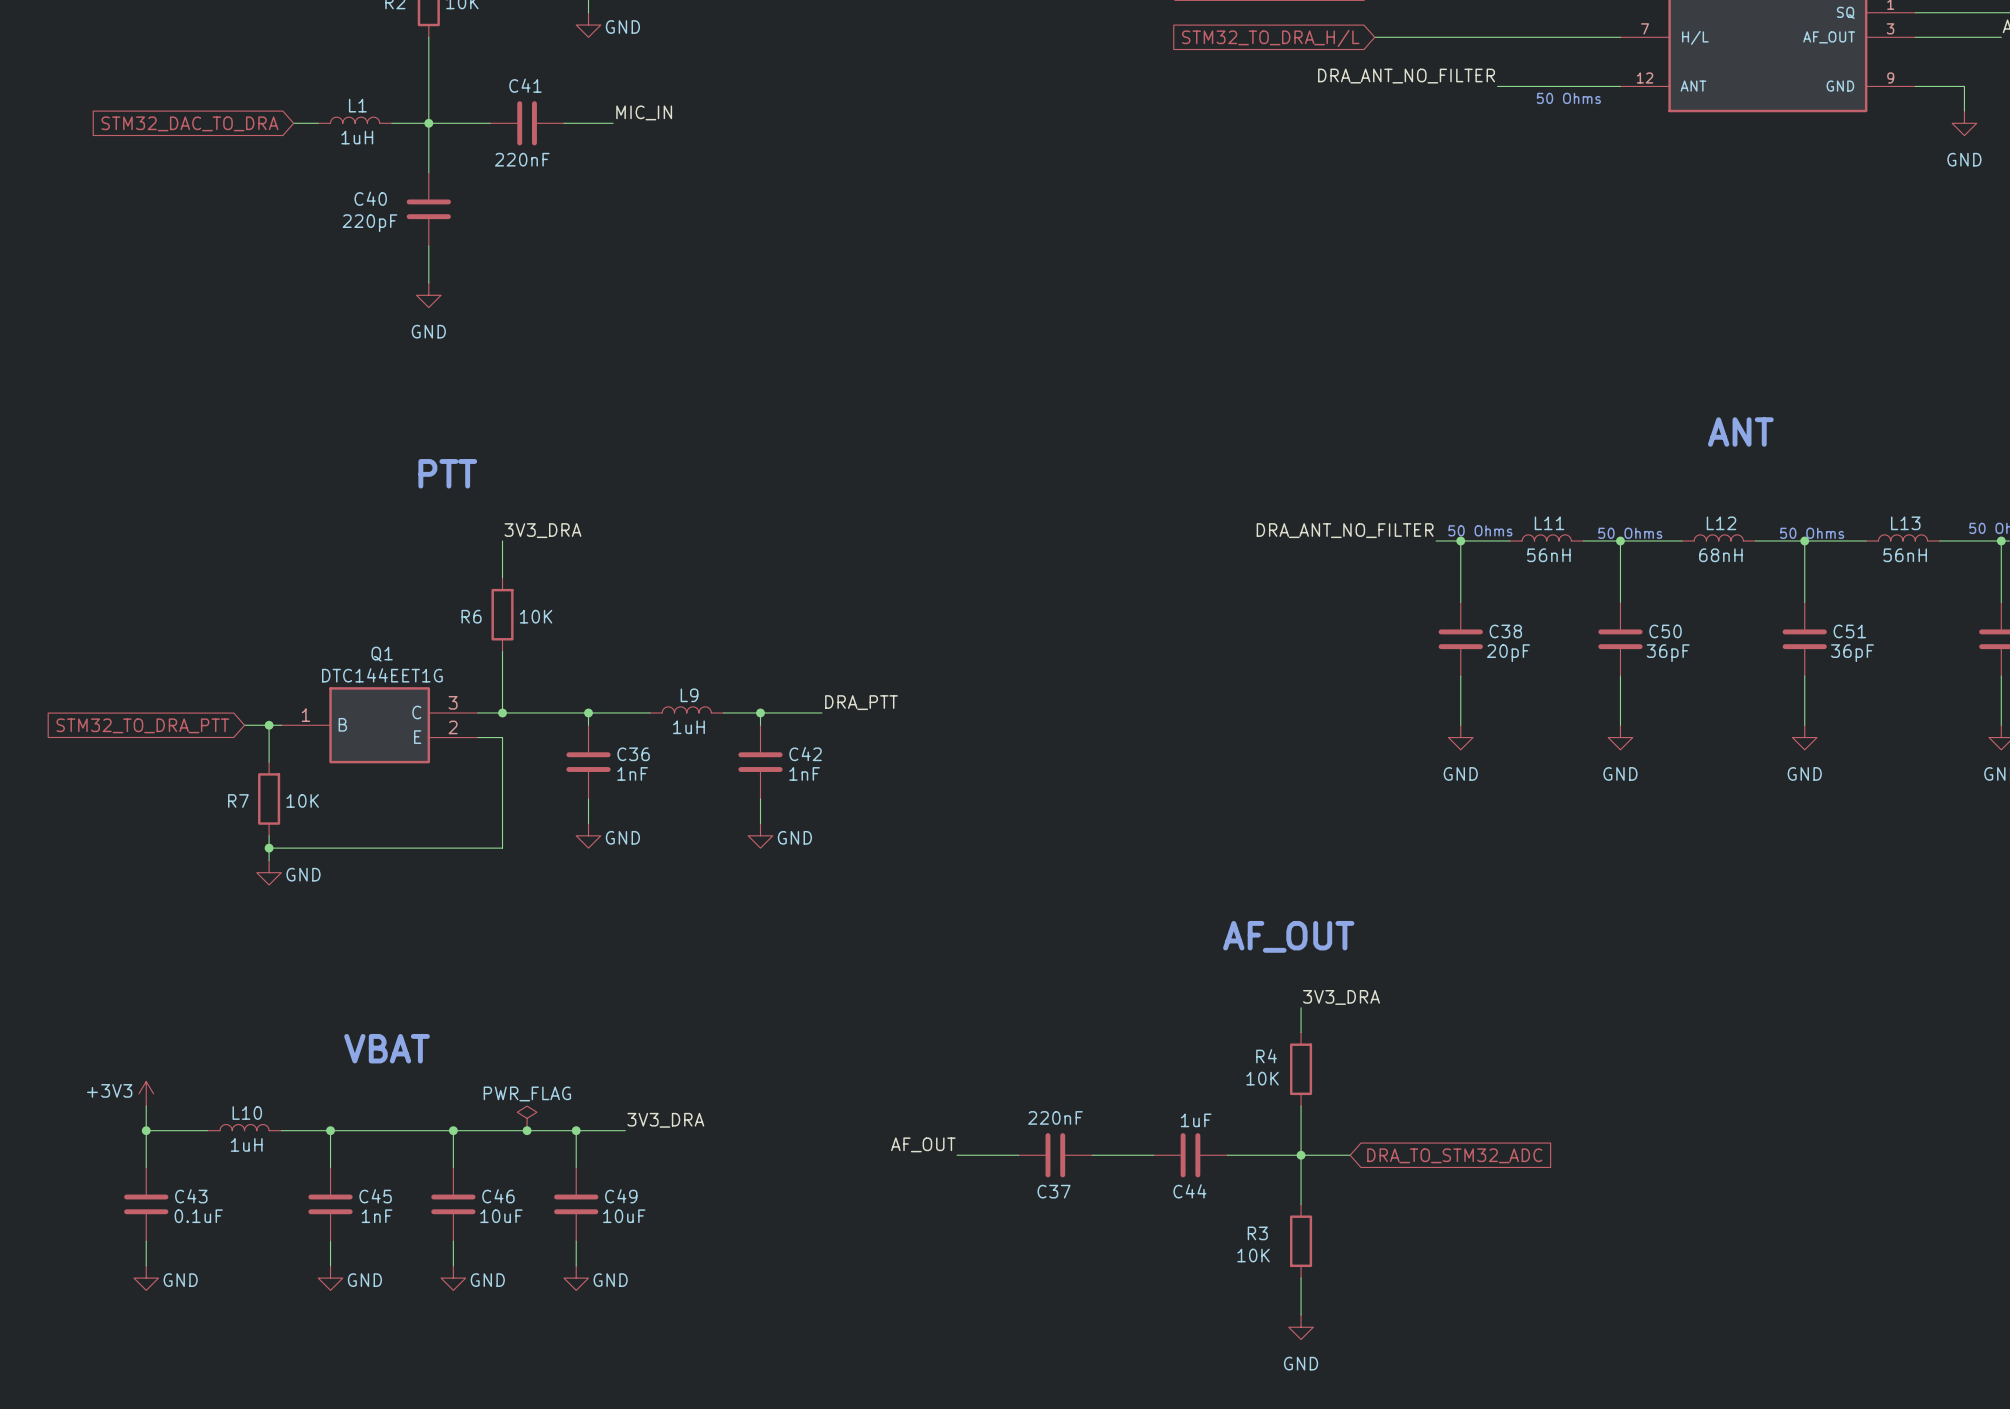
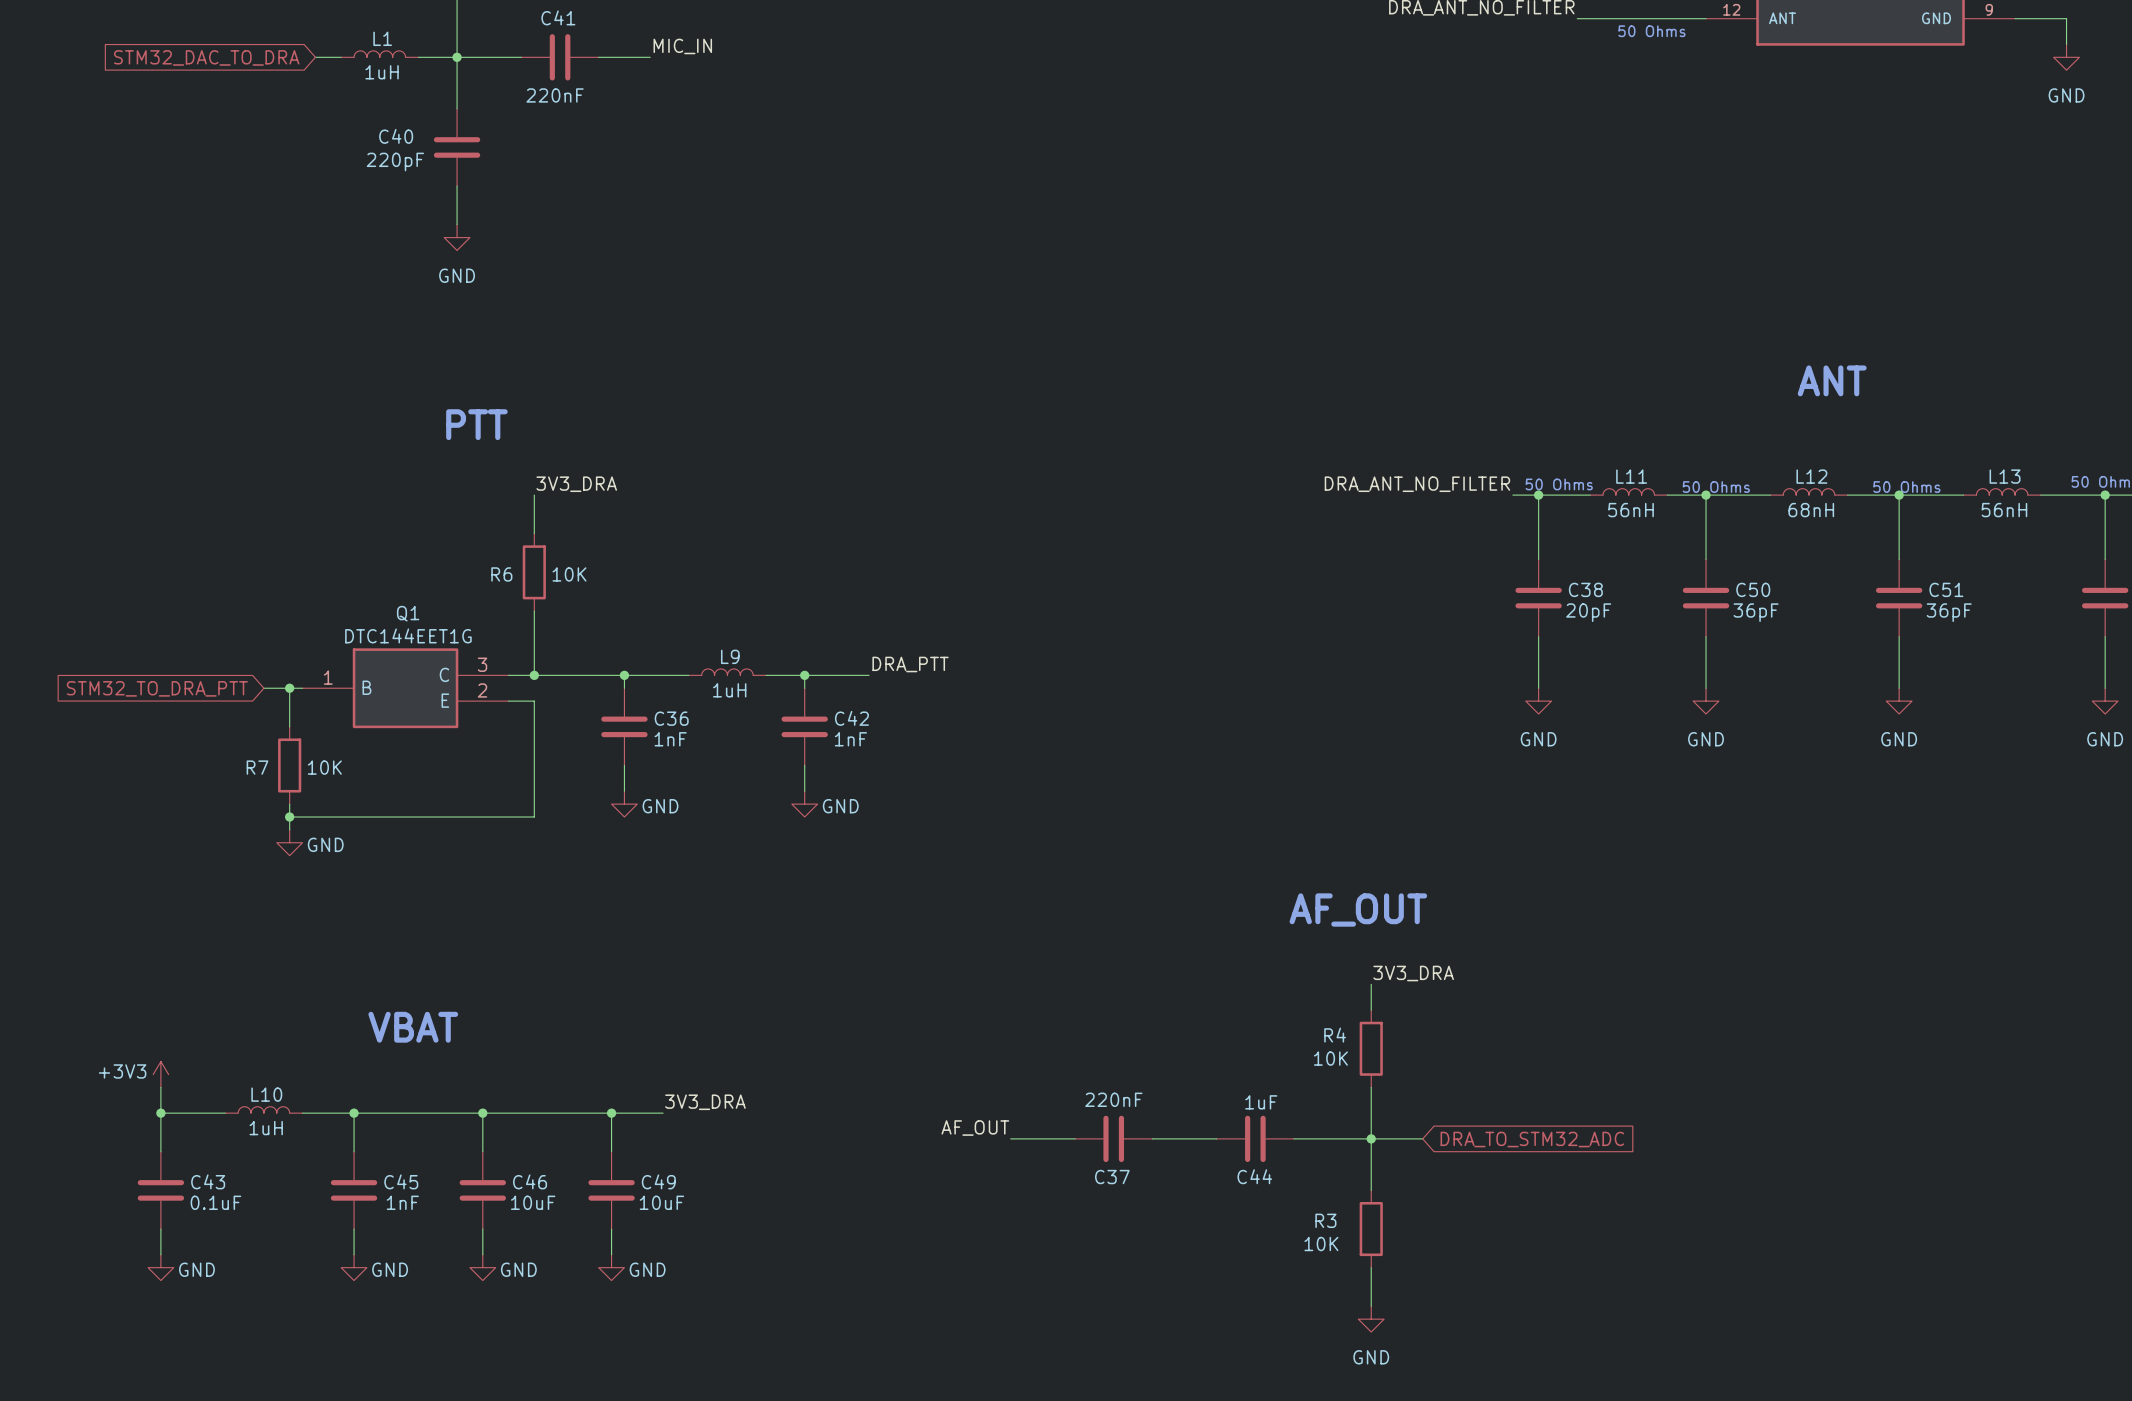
power symbol: PWR_FLAG (527, 1118) -> none
junction: (527, 1130) -> none

